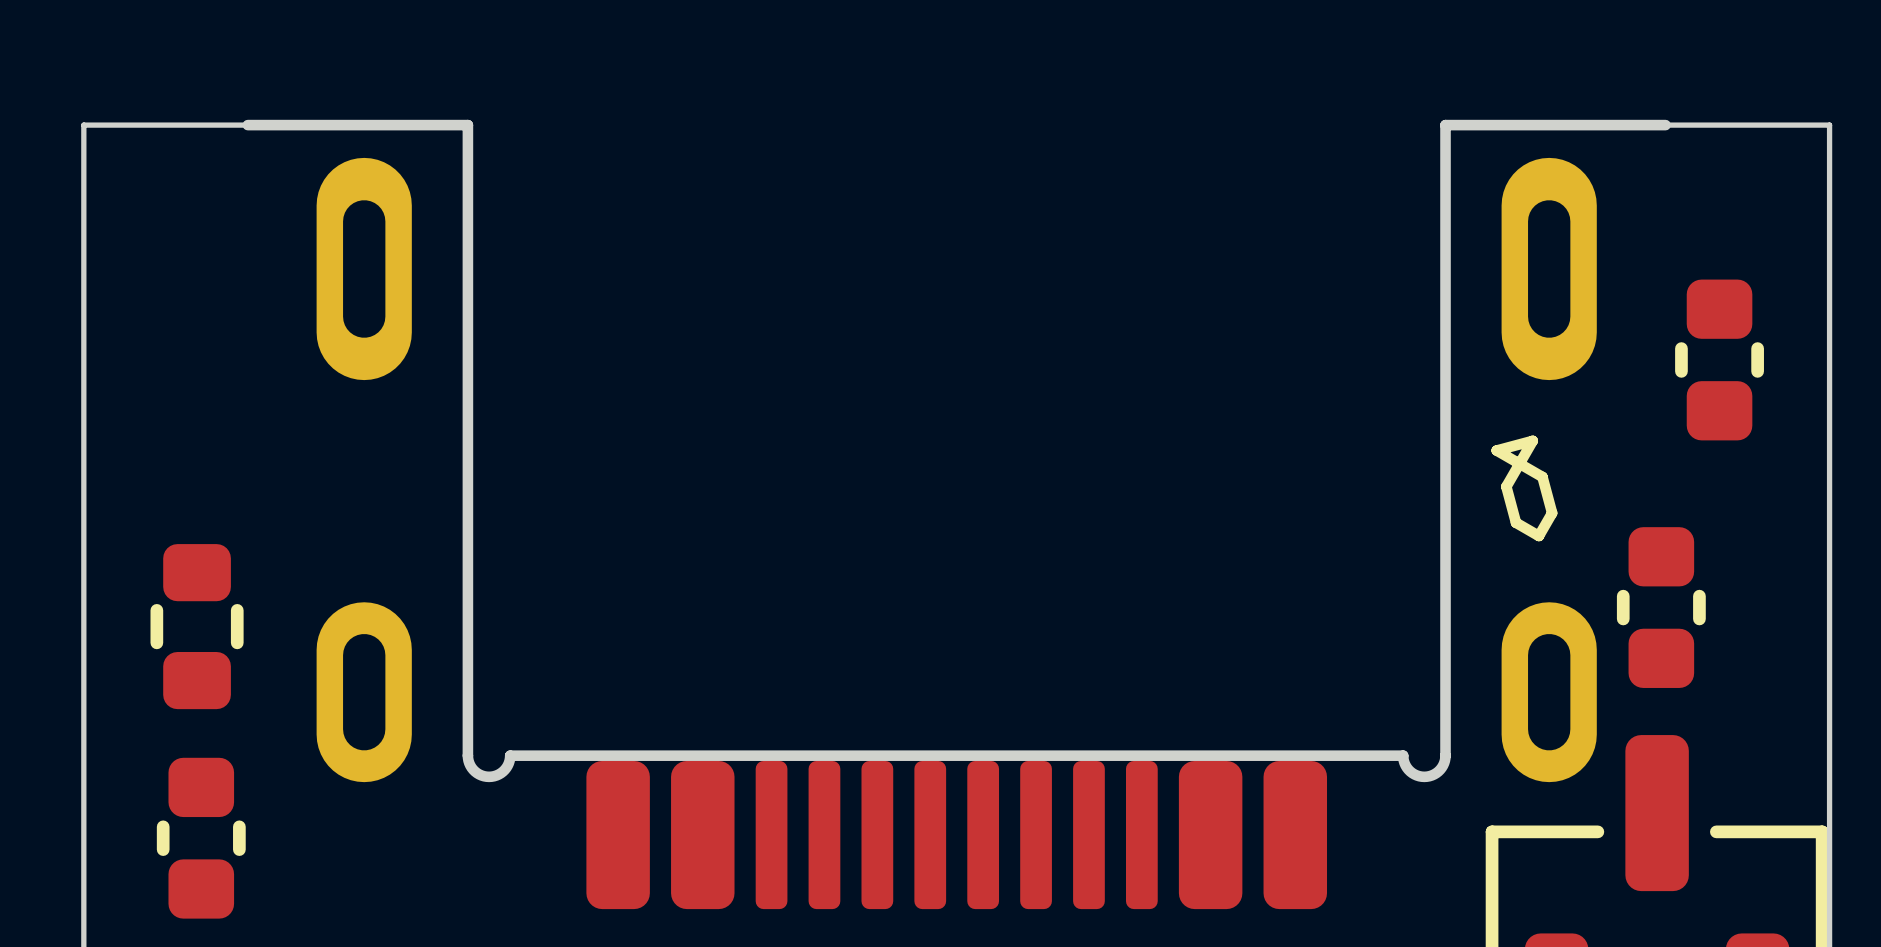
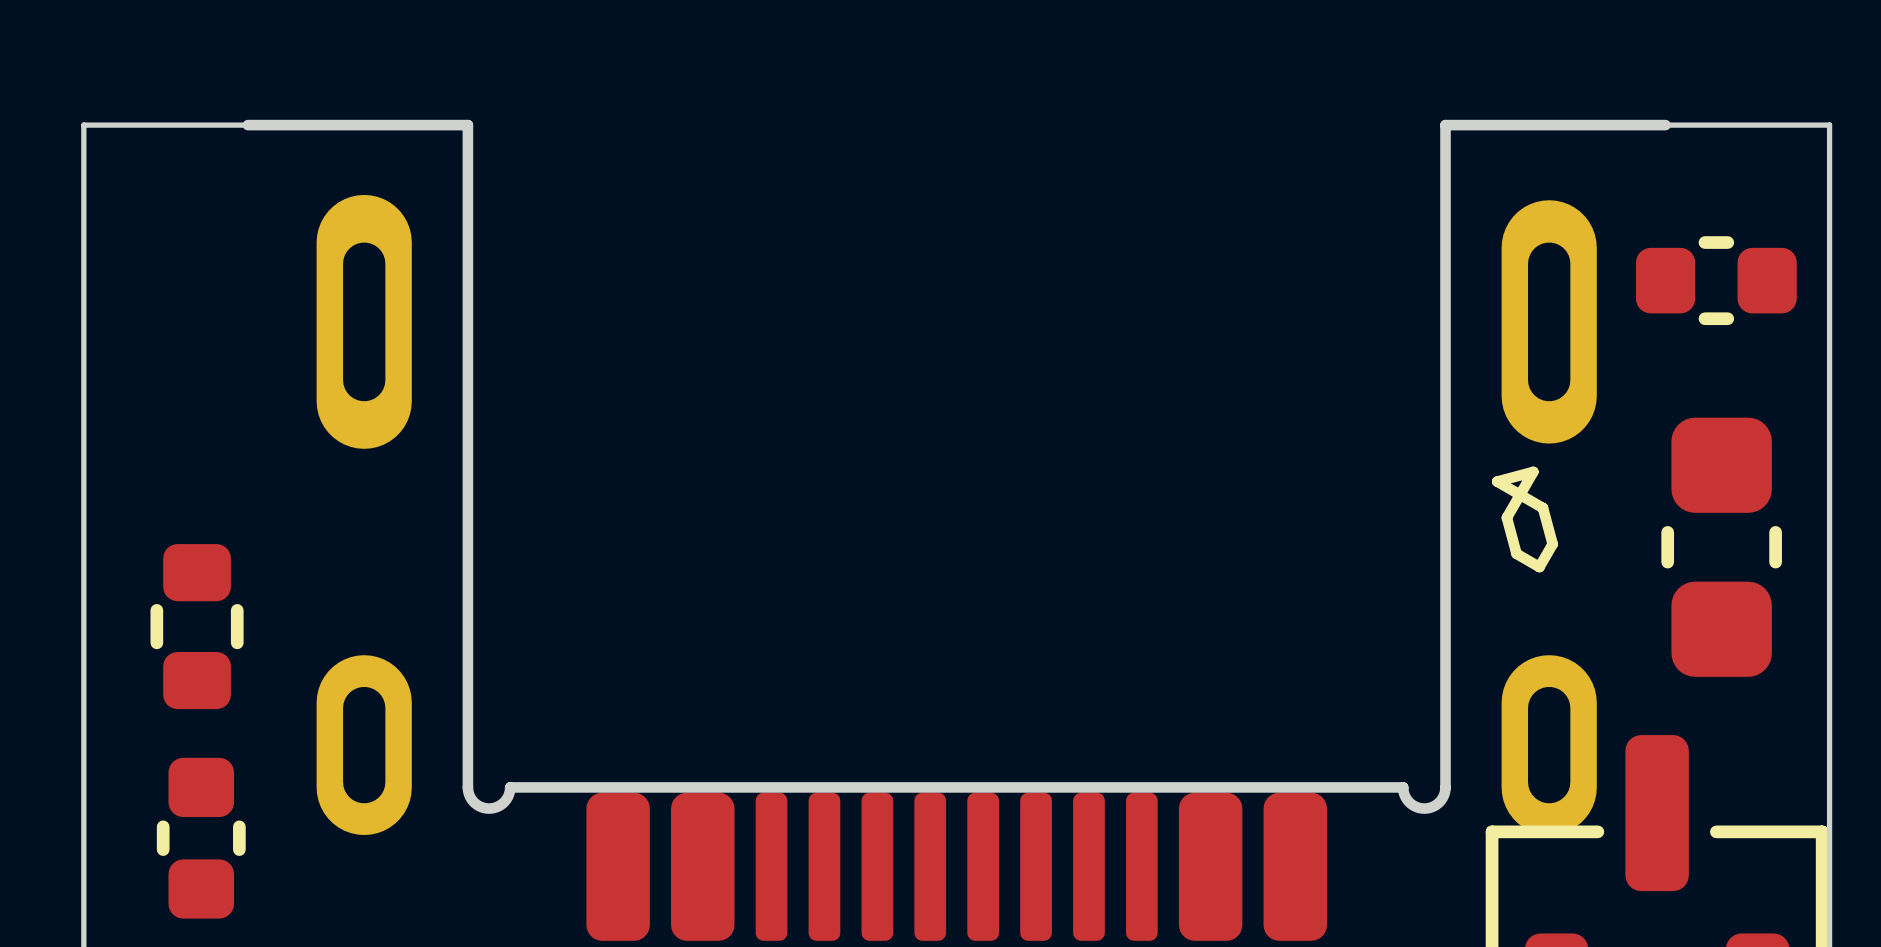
part footprint: [242, 119, 1671, 910] -> [242, 119, 1671, 941]
part rotation: 0° (1719, 359) -> 90° clockwise (1716, 280)
line: (1532, 440) (1496, 450) (1542, 476) (1552, 513) (1538, 536) (1516, 522) (1506, 486) (1532, 440) -> (1533, 471) (1497, 481) (1543, 508) (1552, 544) (1539, 567) (1516, 553) (1506, 517) (1533, 471)
part footprint: [1616, 527, 1706, 688] -> [1661, 417, 1782, 677]

